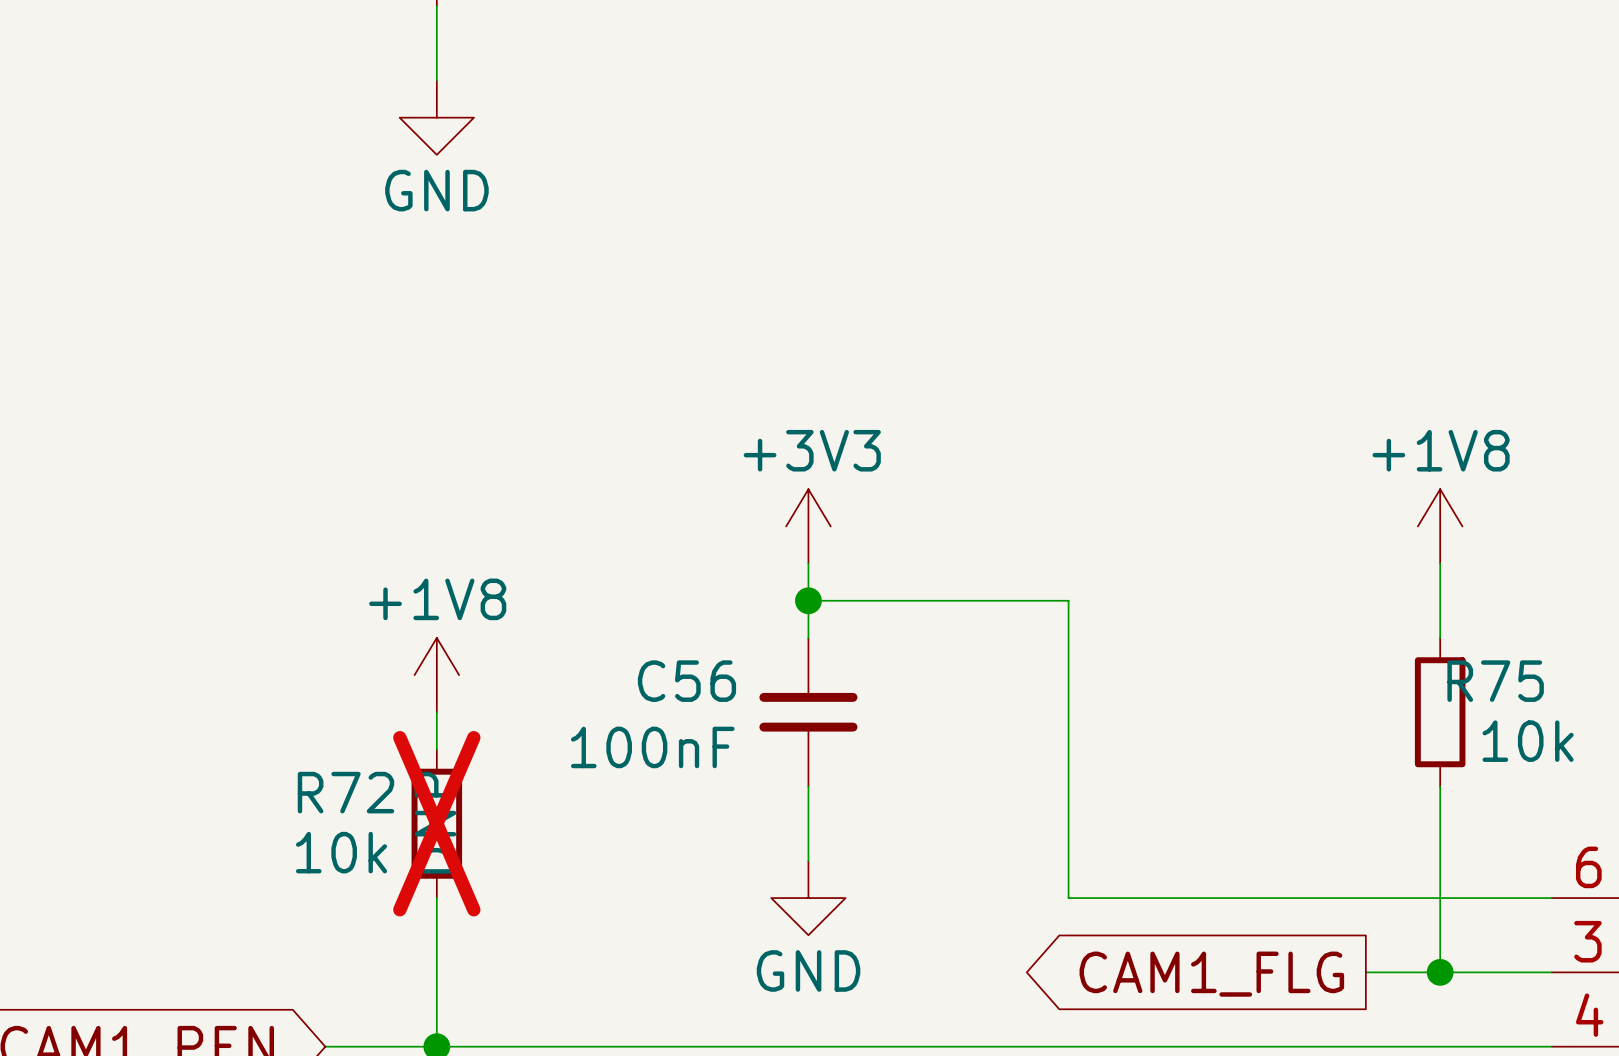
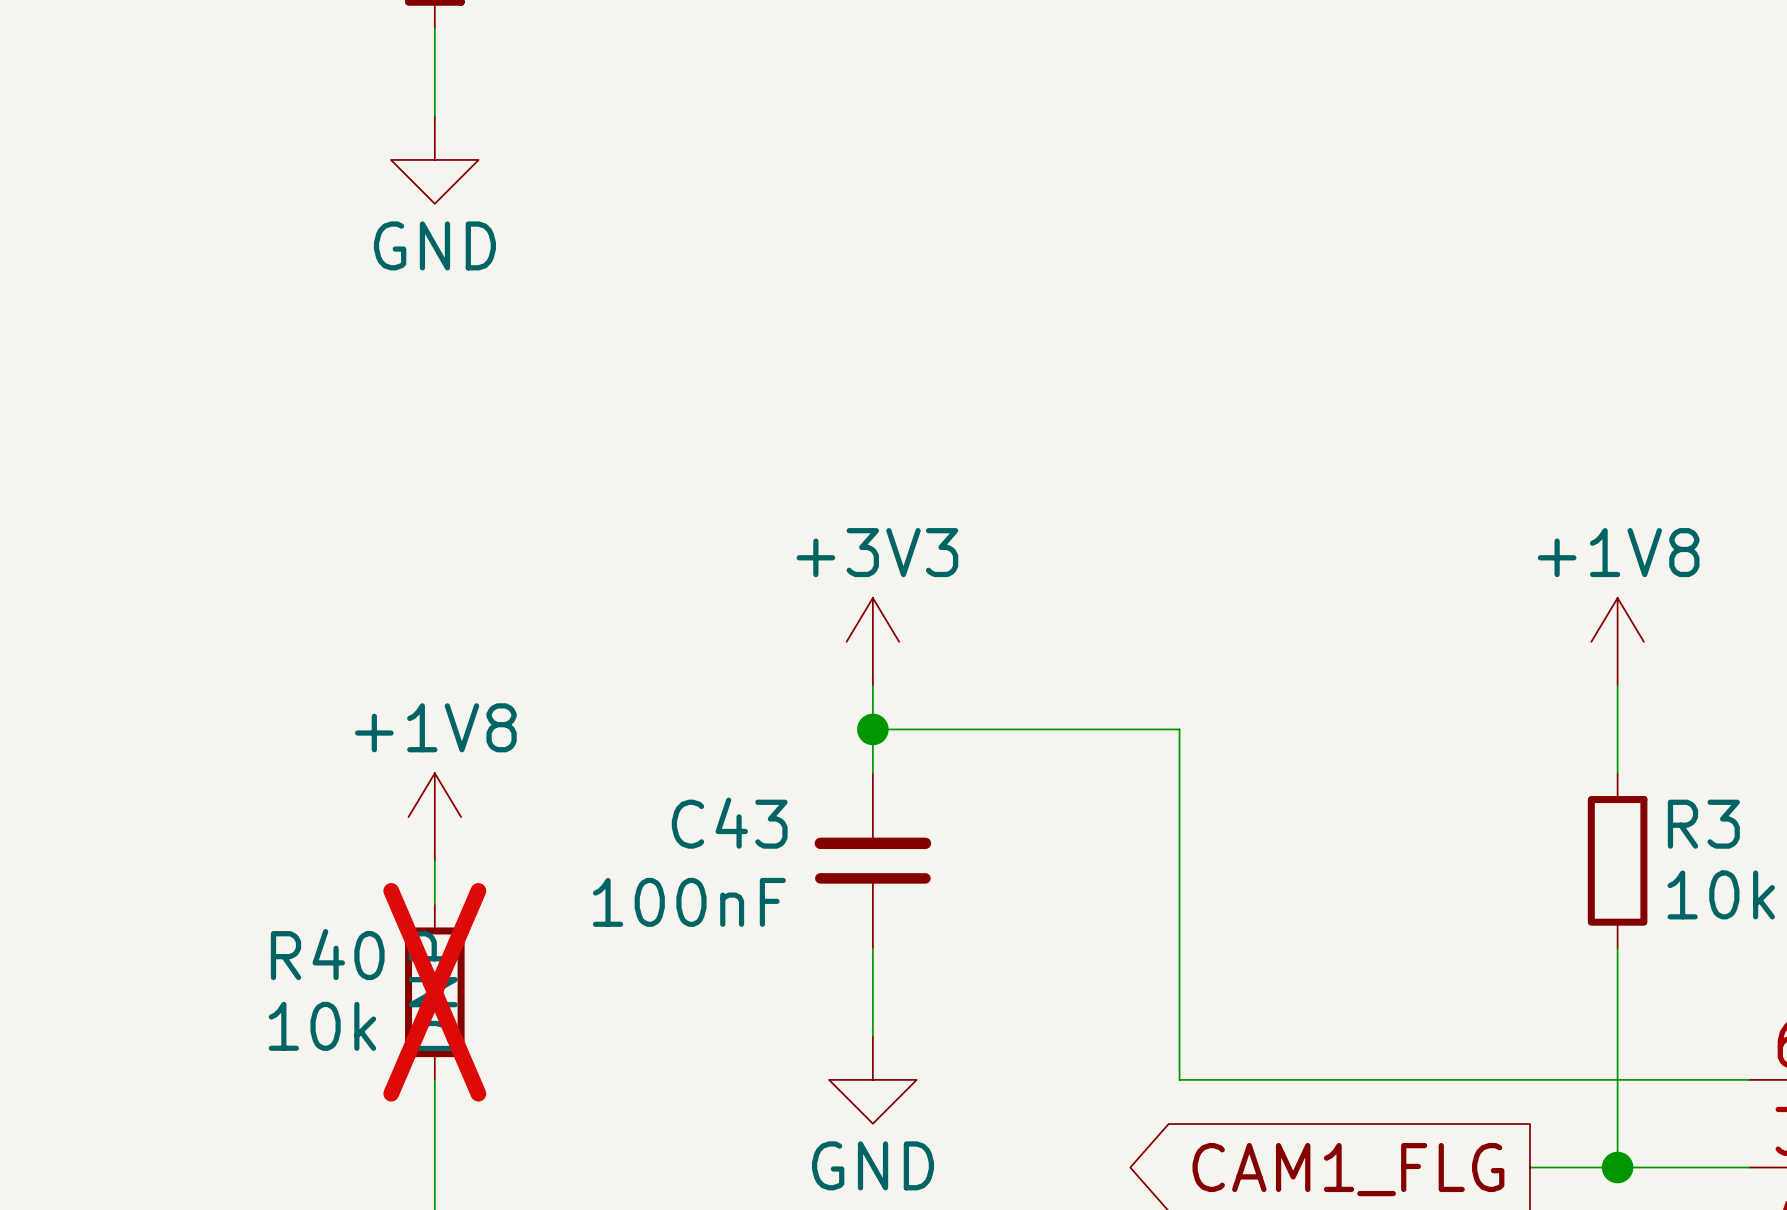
R75 name: R75 (1495, 681) -> R3 (1703, 824)
C56: 100nF (808, 712) -> none
C43: none -> 100nF (872, 860)
R72 name: R72 (345, 792) -> R40 (327, 954)

